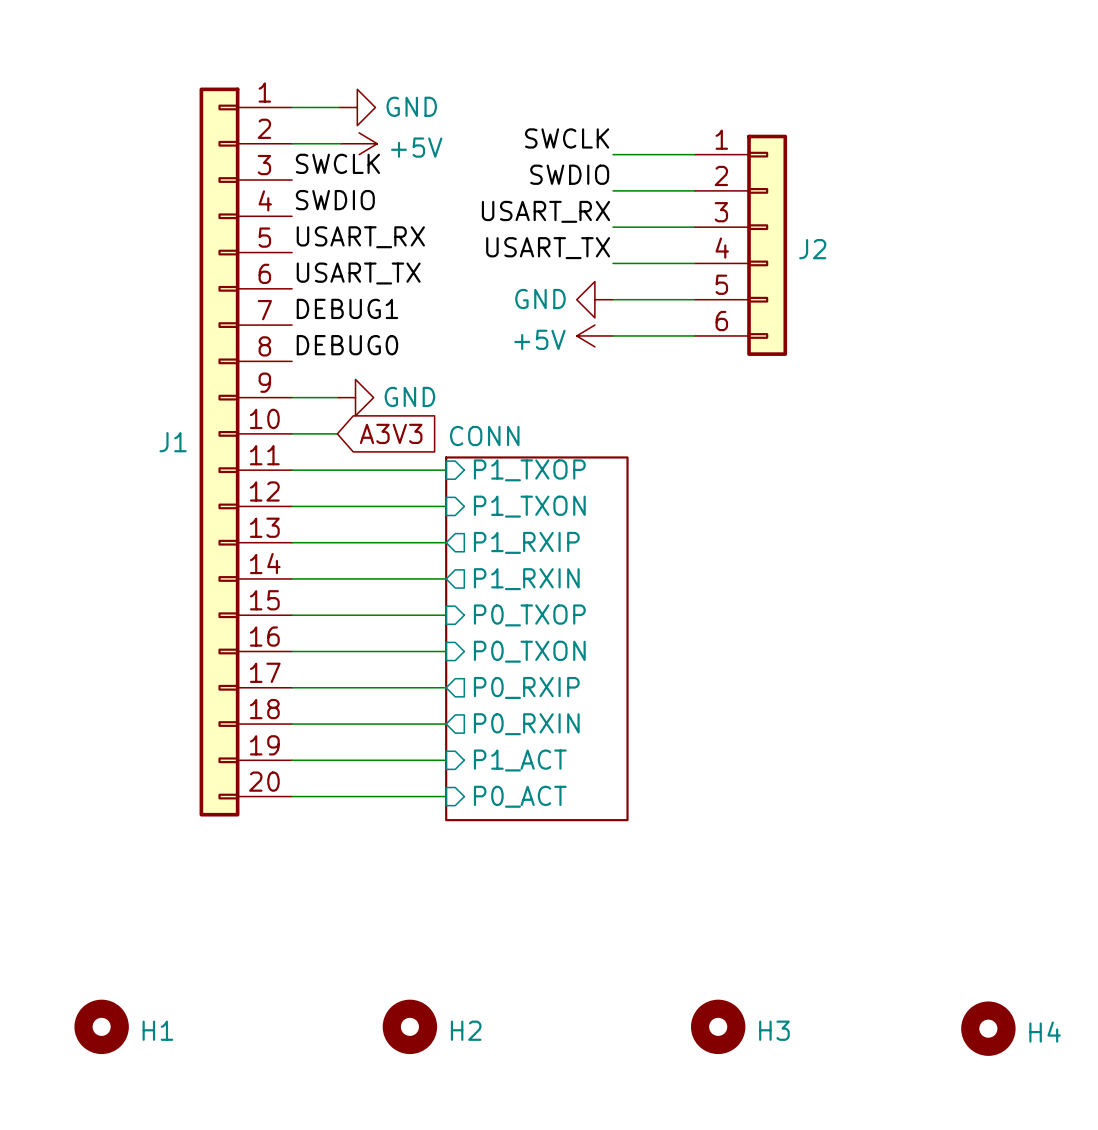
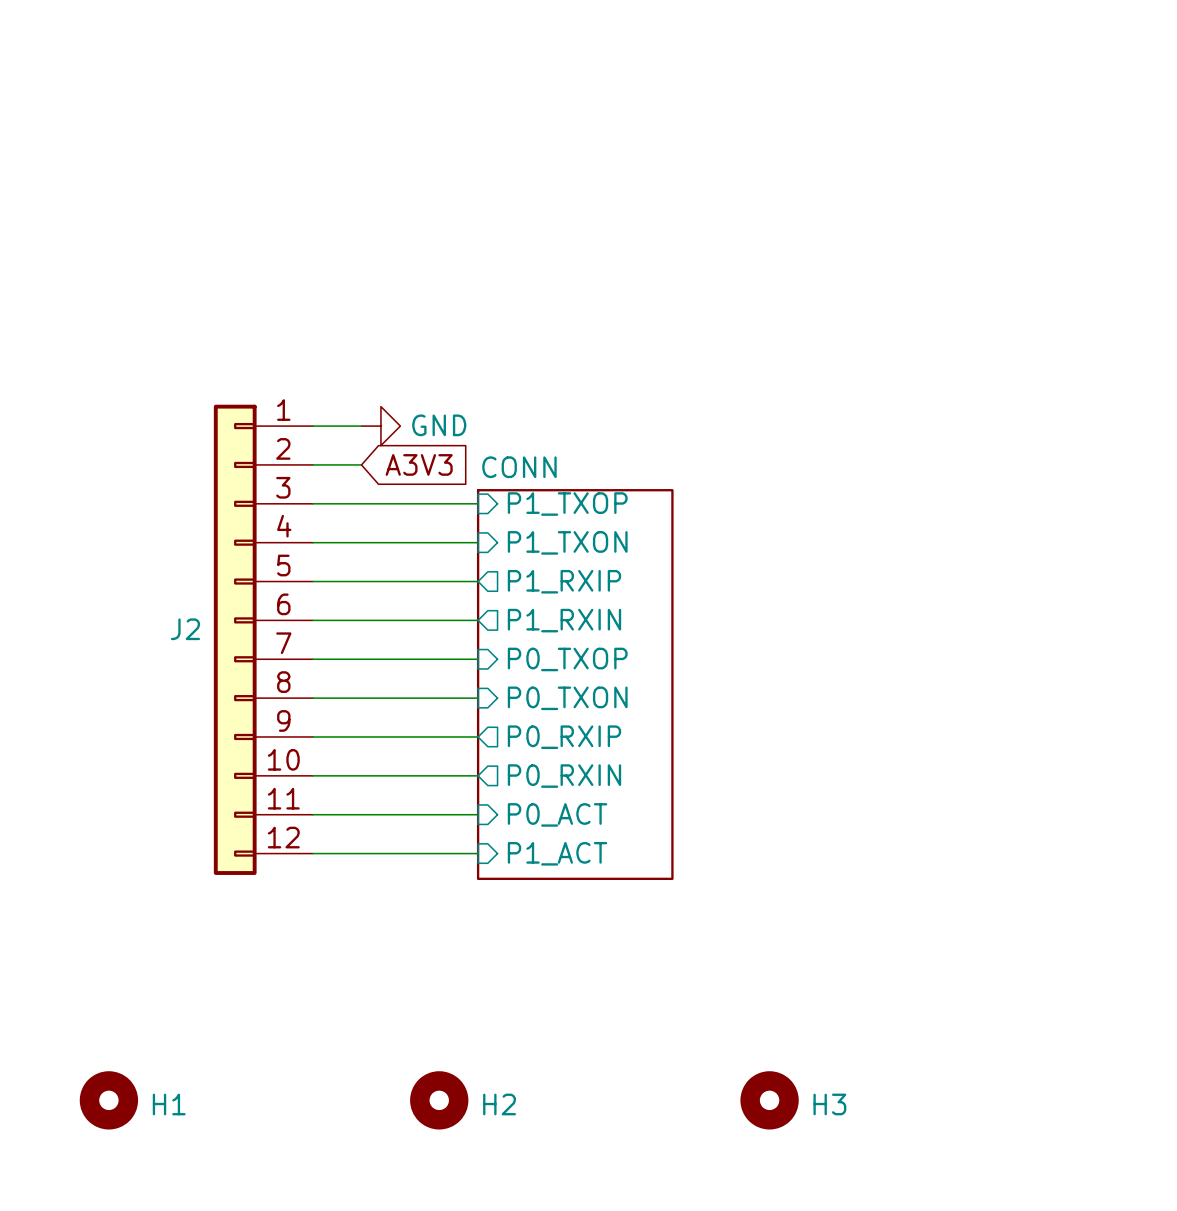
wire: (292, 107) (339, 107) -> none
power symbol: GND (357, 107) -> none
J2 symbol: [694, 134, 788, 356] -> [213, 404, 313, 875]
label: SWCLK (567, 138) -> none
wire: (292, 143) (341, 143) -> none
power symbol: +5V (359, 143) -> none
wire: (613, 154) (694, 154) -> none
label: SWCLK (337, 163) -> none
label: SWDIO (569, 174) -> none
wire: (613, 190) (694, 190) -> none
label: SWDIO (335, 200) -> none
label: USART_RX (545, 211) -> none
wire: (613, 227) (694, 227) -> none
label: USART_RX (360, 237) -> none
label: USART_TX (548, 248) -> none
J2 name position: J2 (812, 249) -> J2 (185, 629)
wire: (613, 263) (694, 263) -> none
label: USART_TX (358, 273) -> none
power symbol: GND (594, 299) -> none
wire: (613, 299) (694, 299) -> none
label: DEBUG1 (347, 308) -> none
power symbol: +5V (594, 335) -> none
wire: (613, 335) (694, 335) -> none
label: DEBUG0 (347, 345) -> none
J1: (245, 452) -> none
sheet pin: P1_ACT (520, 760) -> P0_ACT (557, 814)
sheet pin: P0_ACT (520, 796) -> P1_ACT (557, 853)
H4: (988, 1028) -> none

